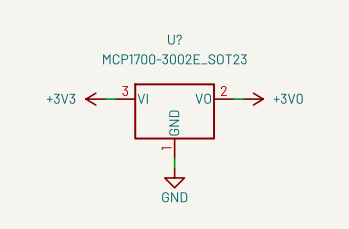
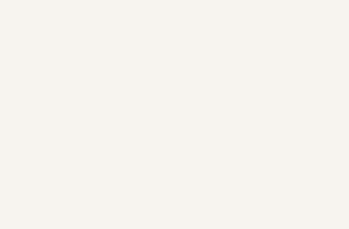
power symbol: +3V3 (95, 99) -> none
wire: (105, 99) (115, 99) -> none
wire: (233, 99) (243, 99) -> none
power symbol: +3V0 (253, 99) -> none
U?: MCP1700-3002E_SOT23 (174, 120) -> none
wire: (174, 158) (174, 168) -> none
power symbol: GND (174, 177) -> none

